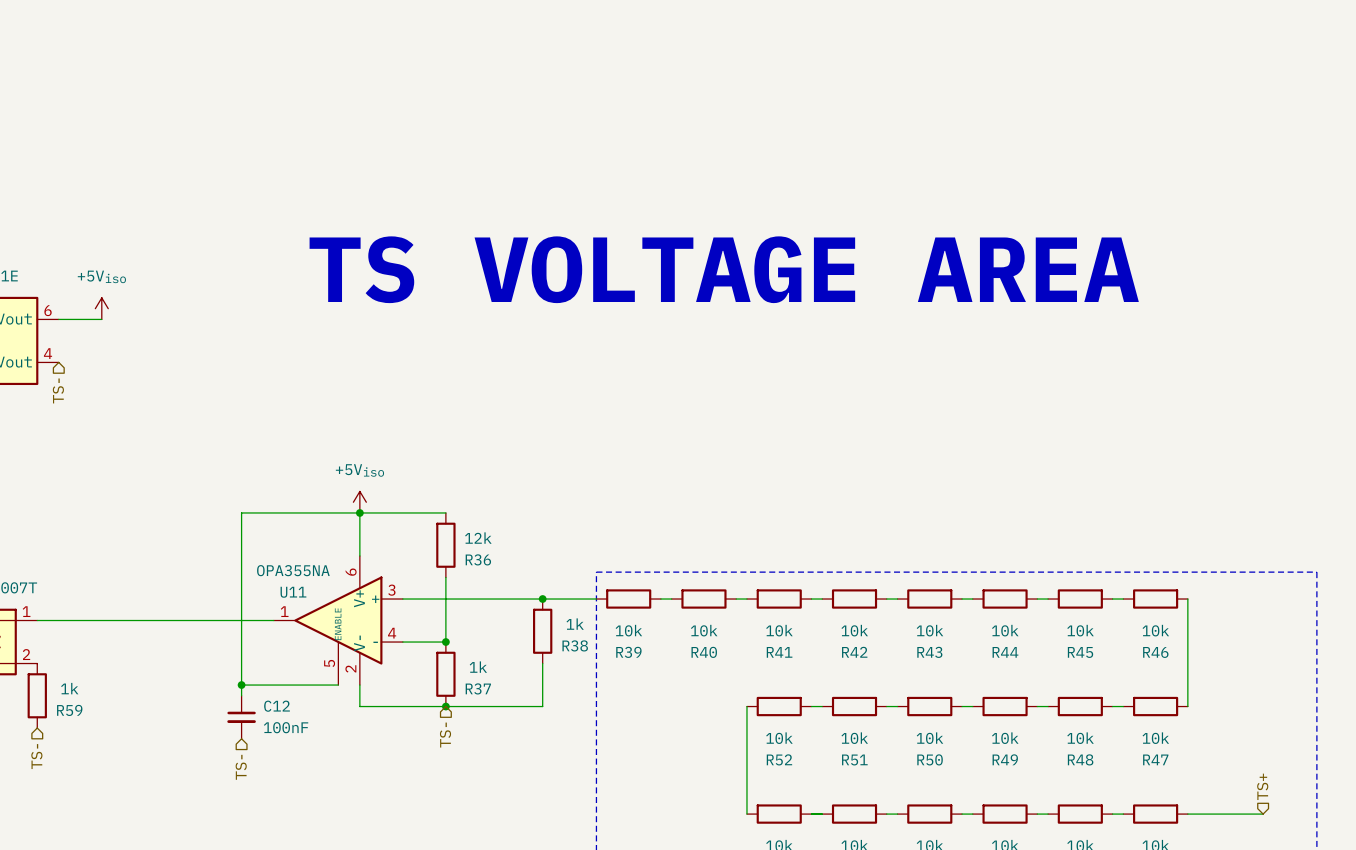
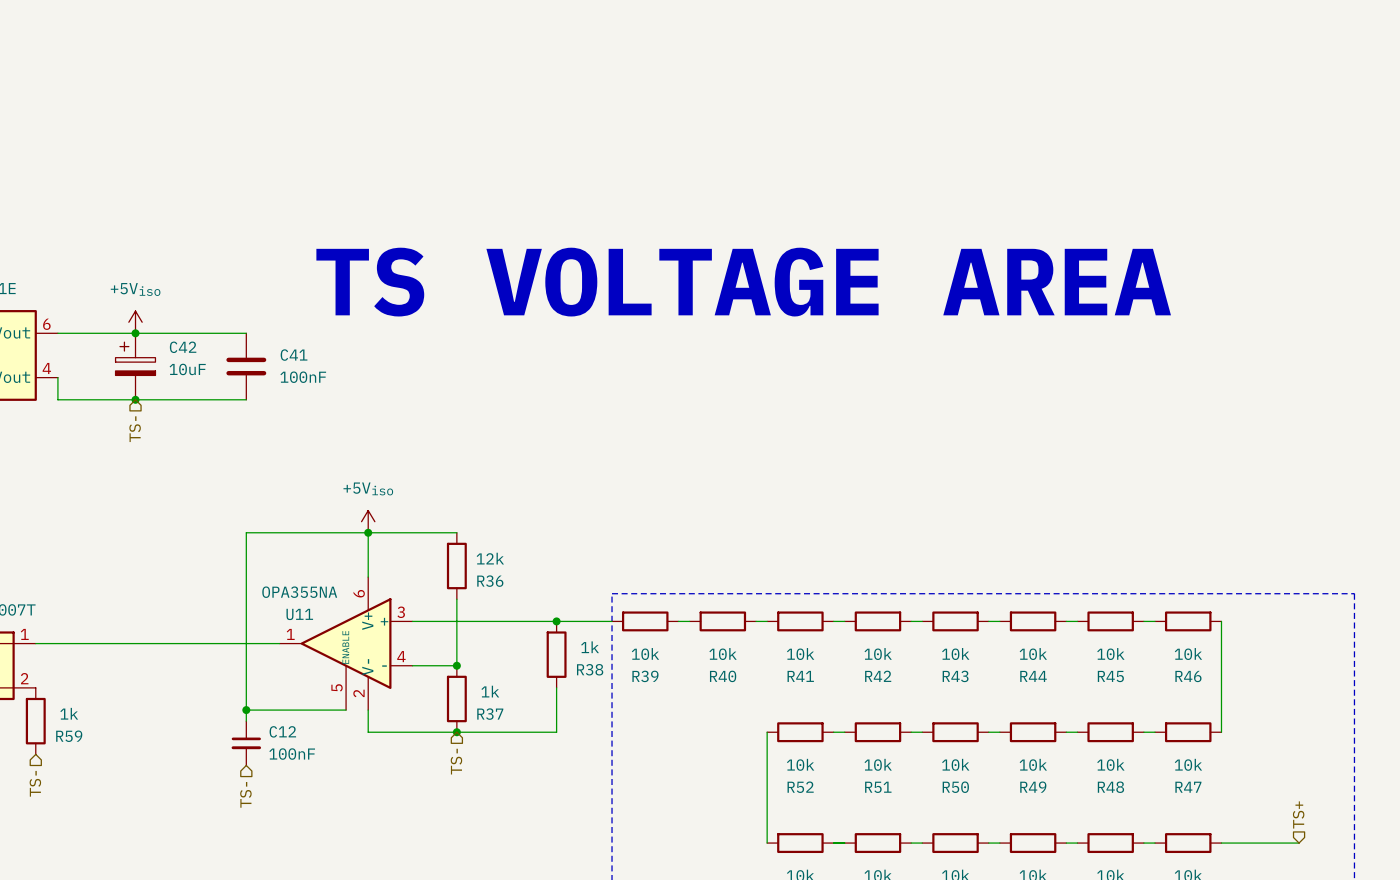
power symbol position: +5Viso (101, 308) -> +5Viso (135, 322)
wire: none -> (102, 333) (246, 333)
junction: none -> (135, 333)
C42: none -> 10uF (135, 366)
C41: none -> 100nF (246, 366)
wire: none -> (57, 377) (57, 399) (246, 399)
junction: none -> (135, 399)
hierarchical label position: TS- (58, 390) -> TS- (135, 429)

